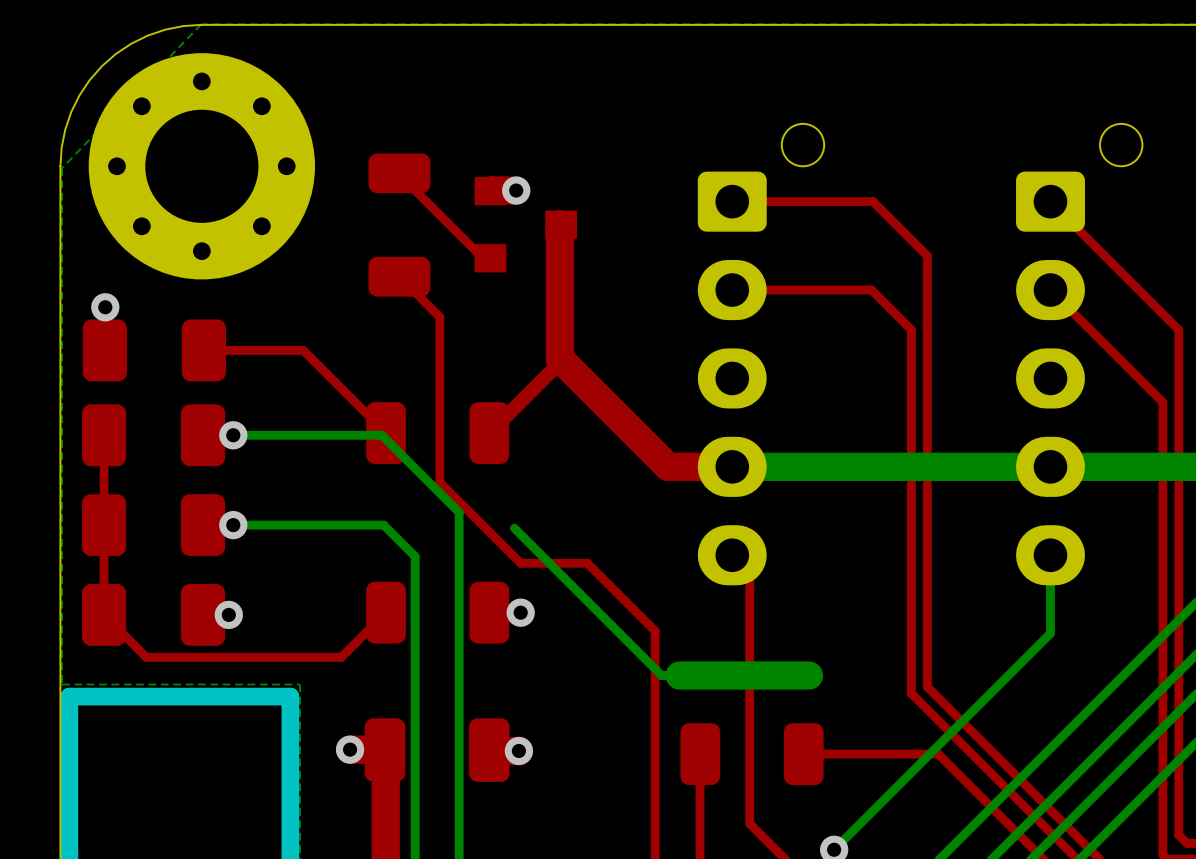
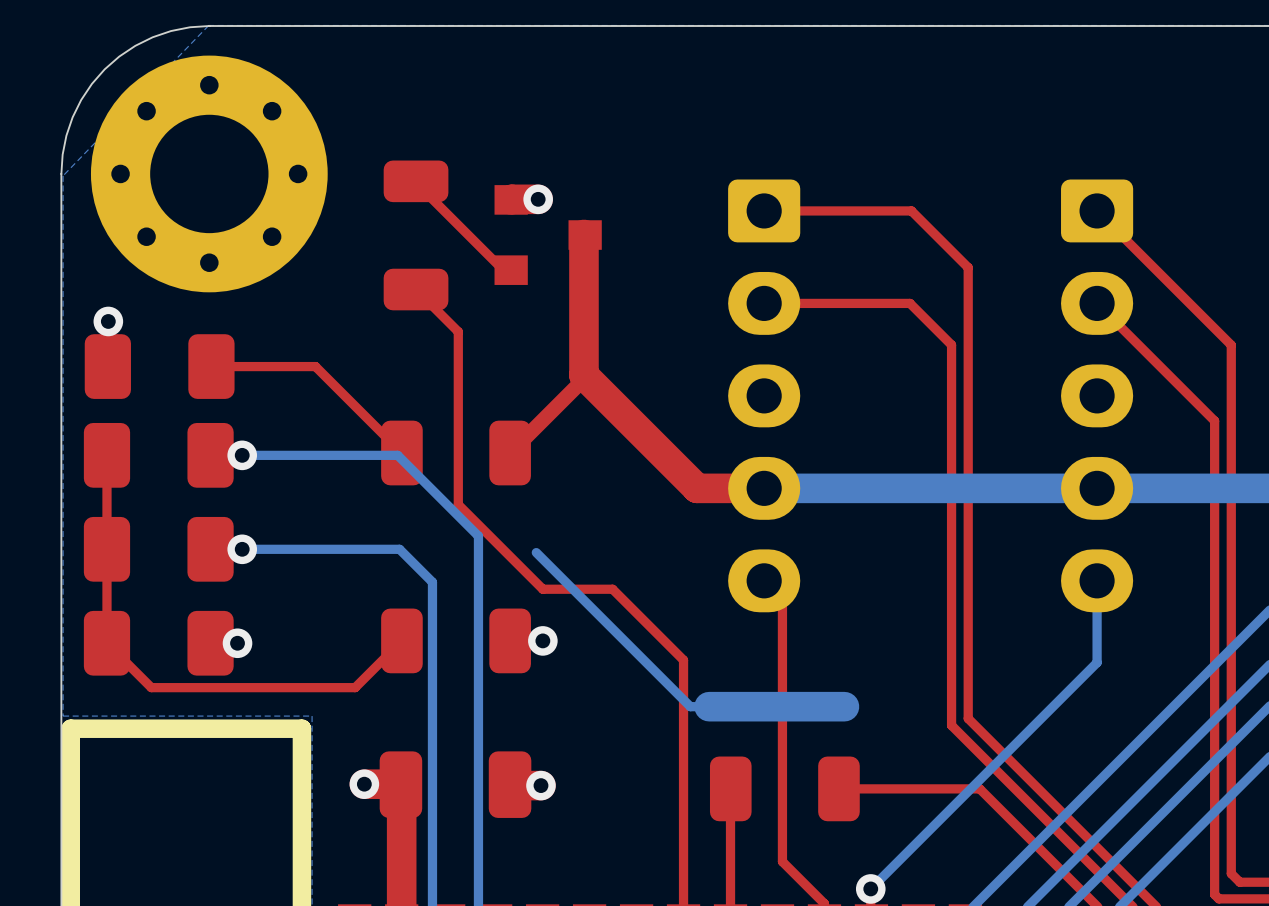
part: (760, 354) -> none
part: (1079, 354) -> none

